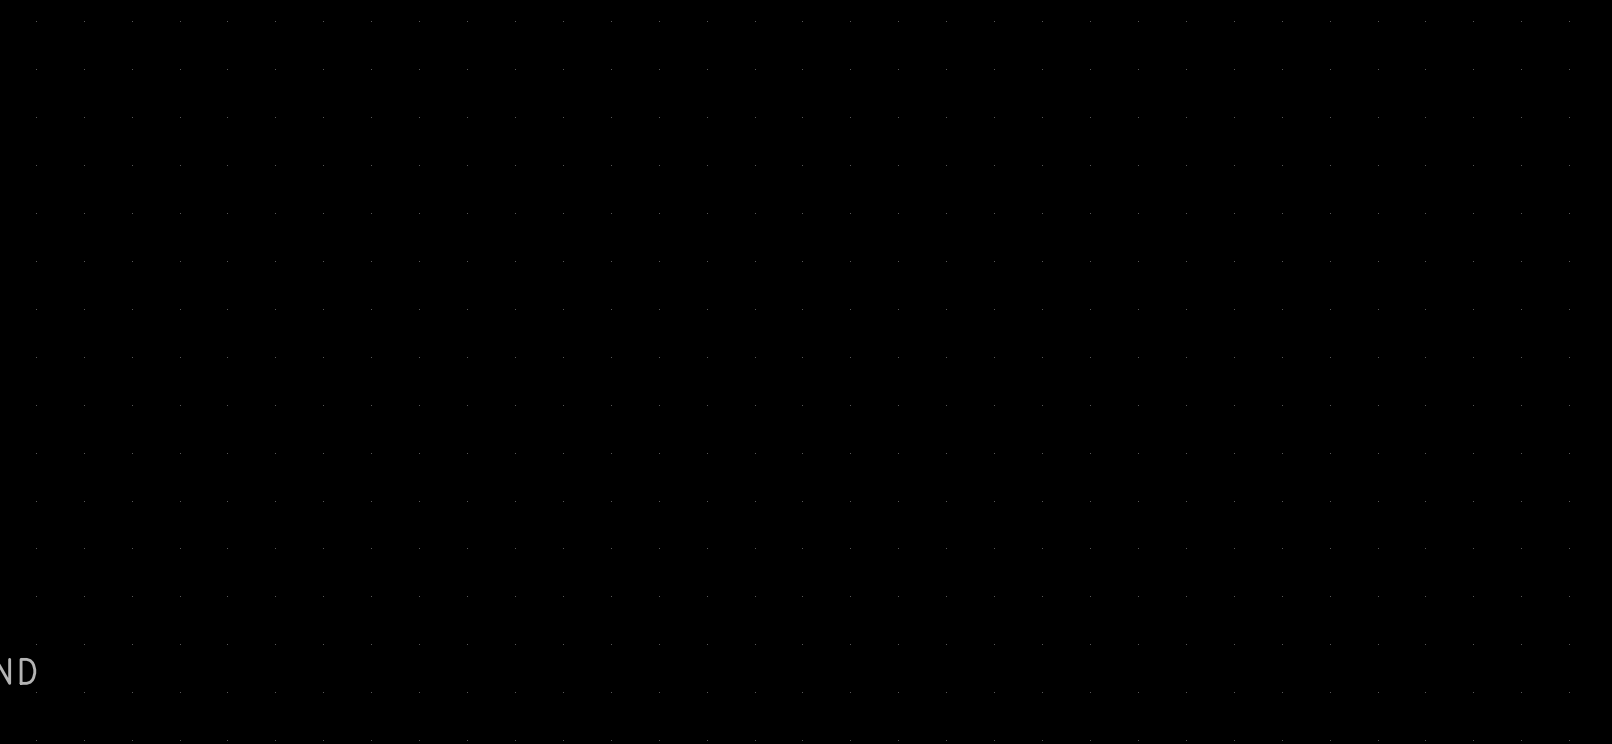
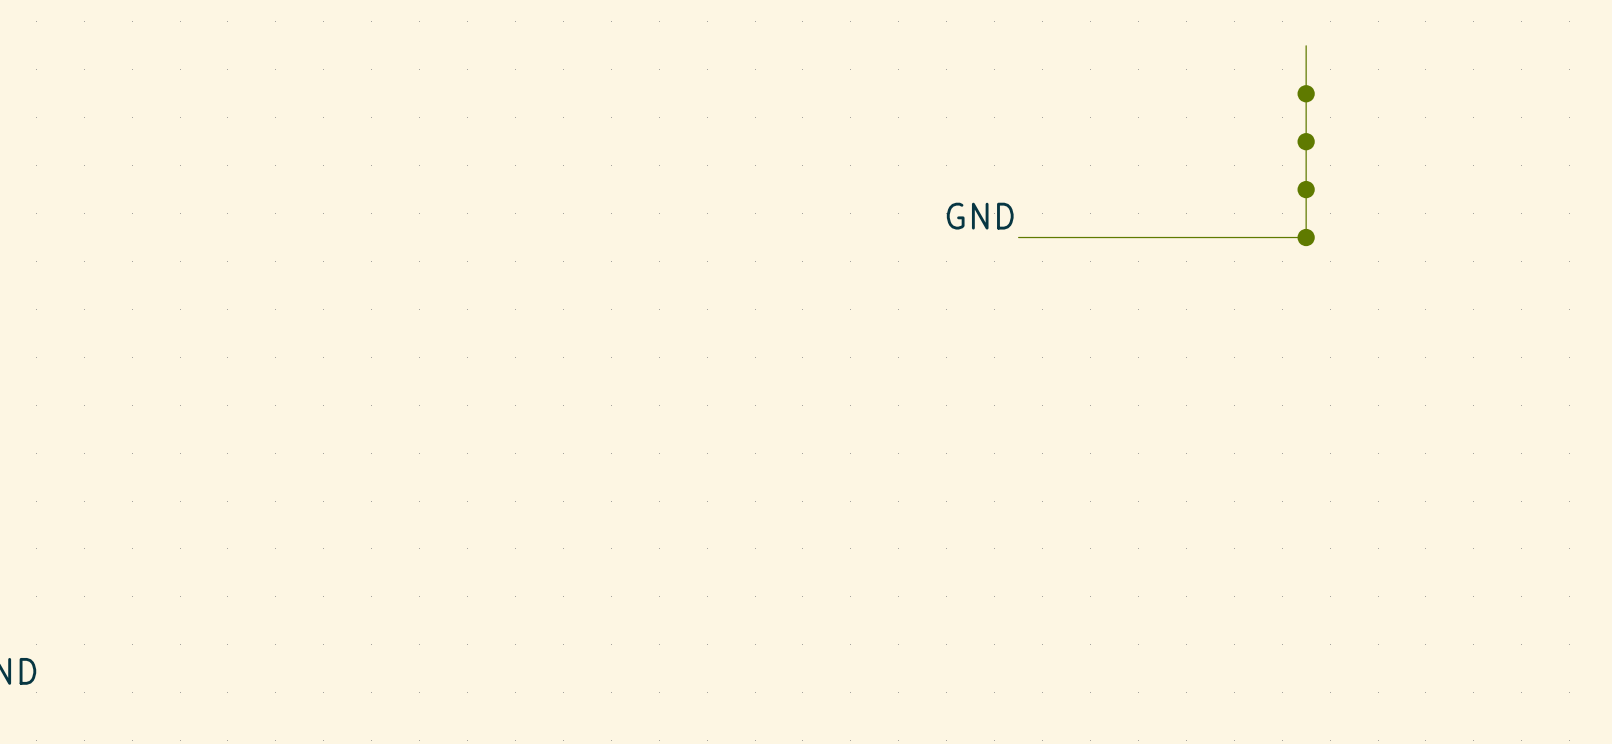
wire: none -> (1306, 45) (1306, 237) (1018, 237)
junction: none -> (1306, 93)
junction: none -> (1306, 141)
junction: none -> (1306, 189)
label: none -> GND (980, 216)
junction: none -> (1306, 237)

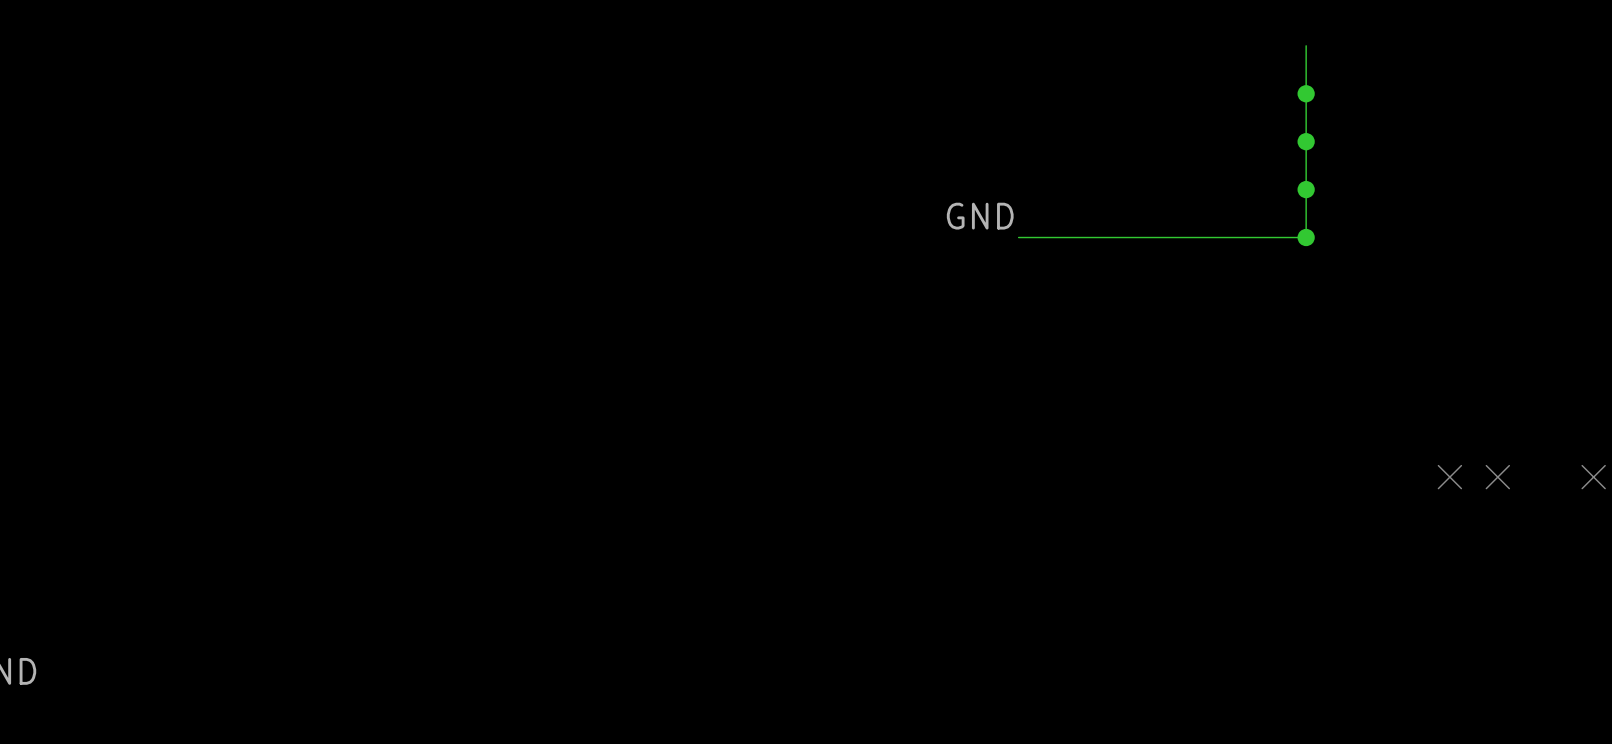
no-connect mark: none -> (1449, 477)
no-connect mark: none -> (1497, 477)
no-connect mark: none -> (1593, 477)

